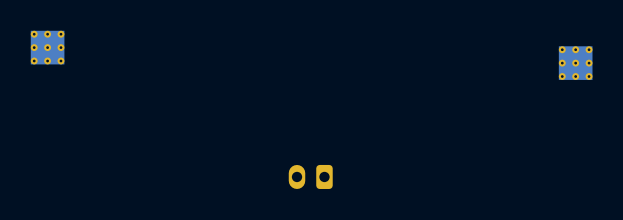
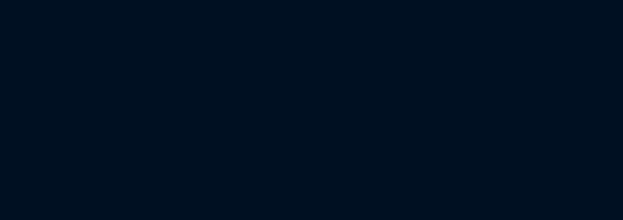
part: (47, 47) -> none
part: (575, 63) -> none
part: (310, 176) -> none

